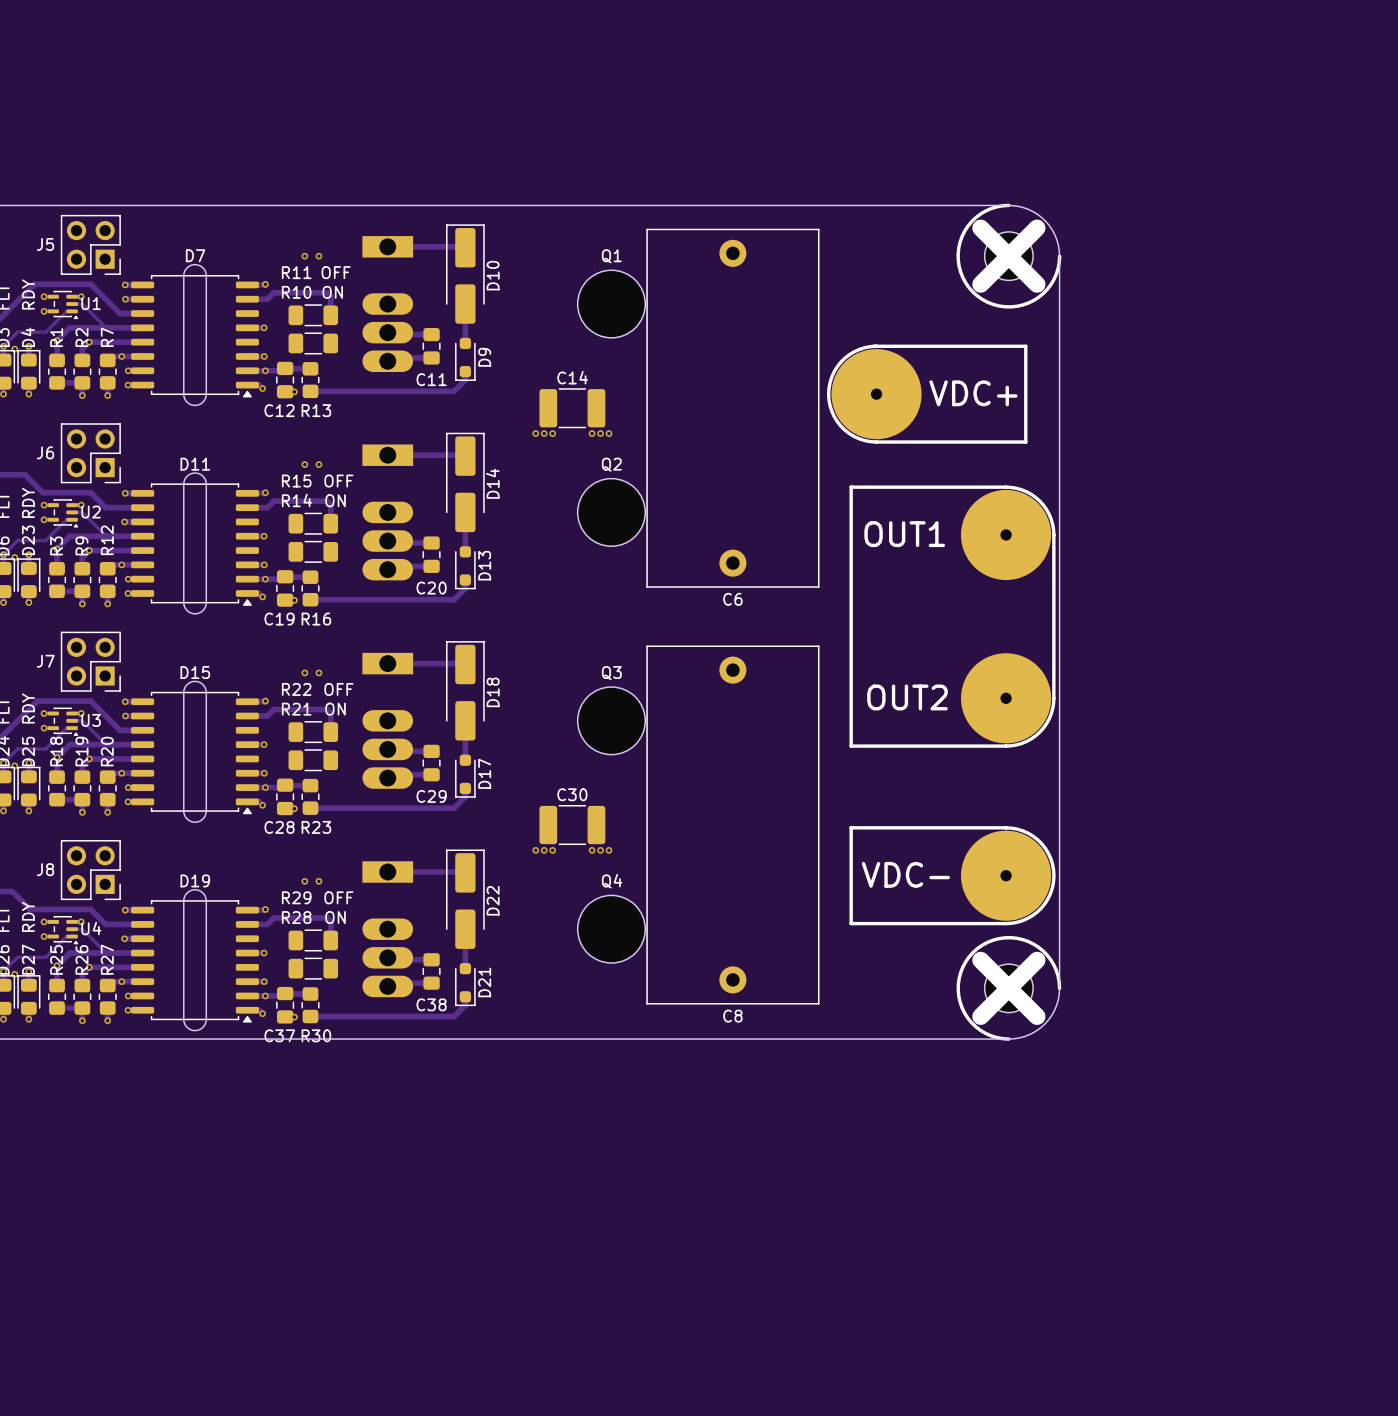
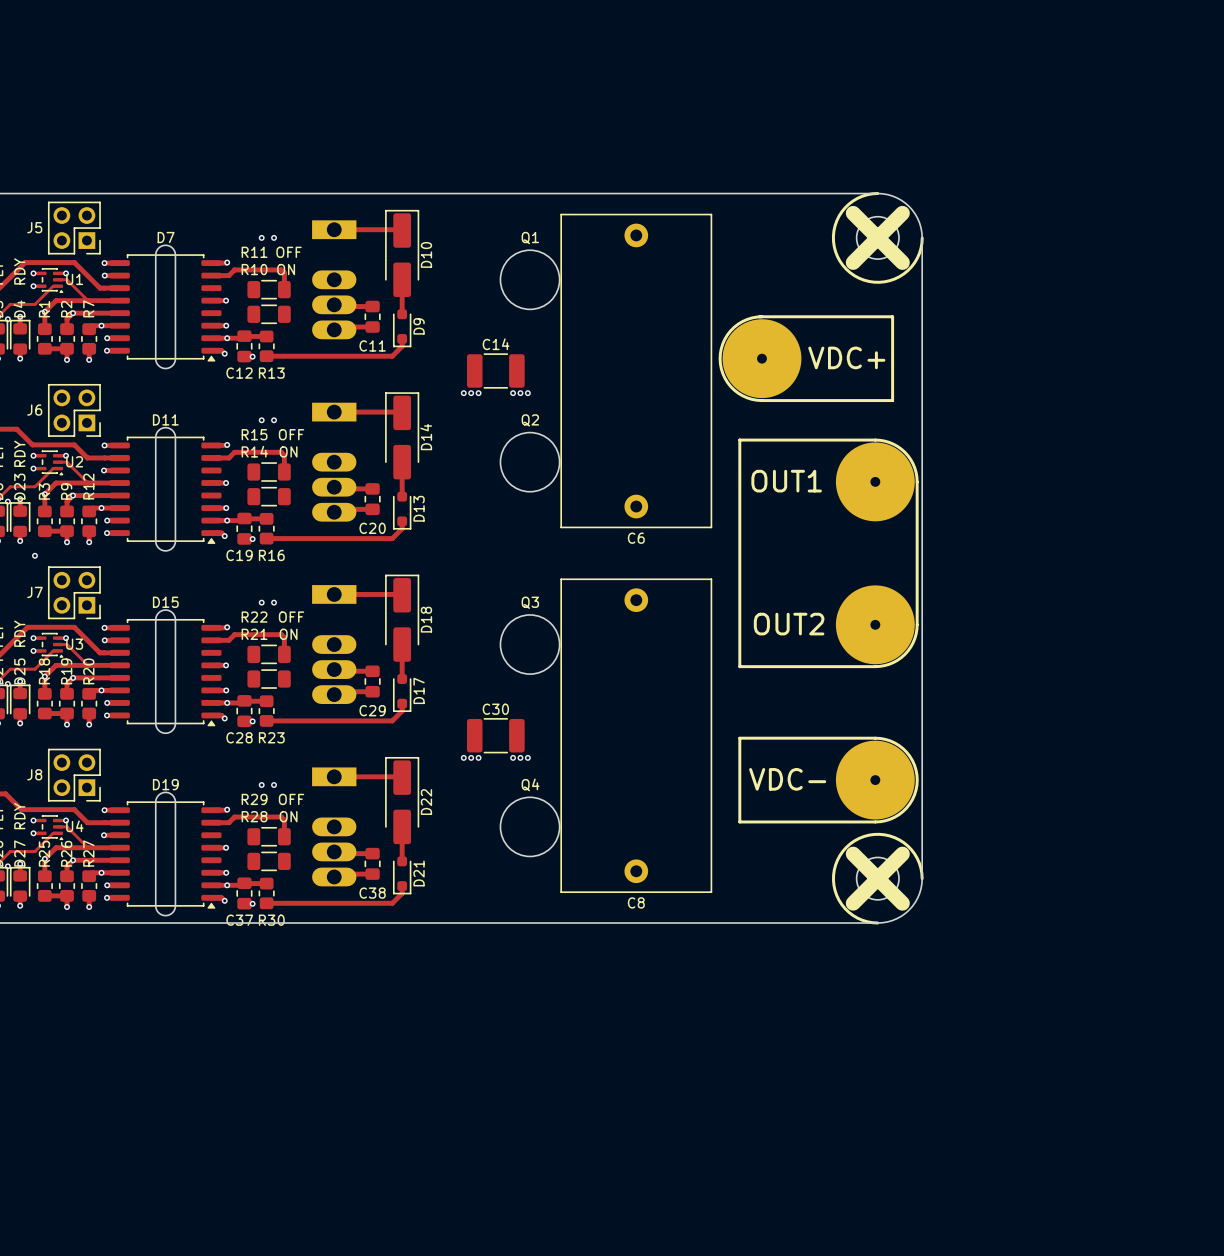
via: none -> (34, 555)

